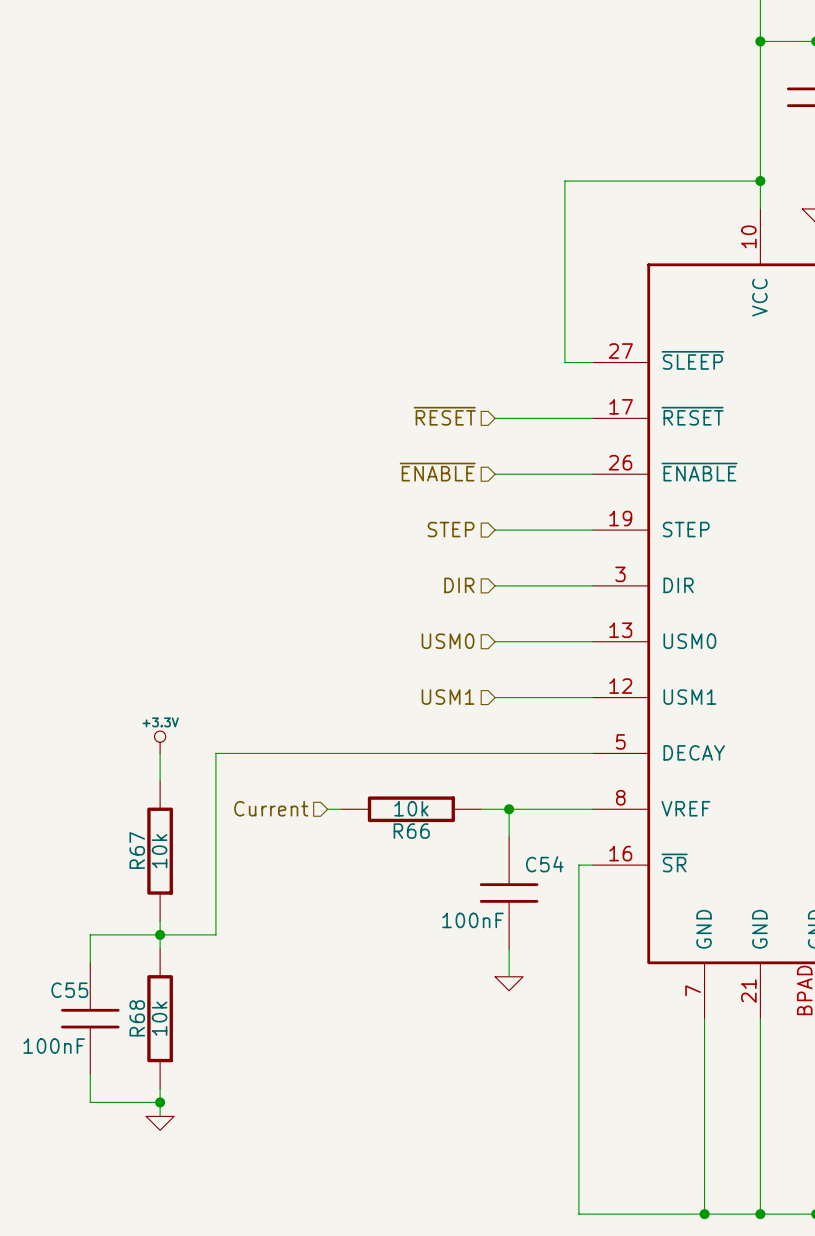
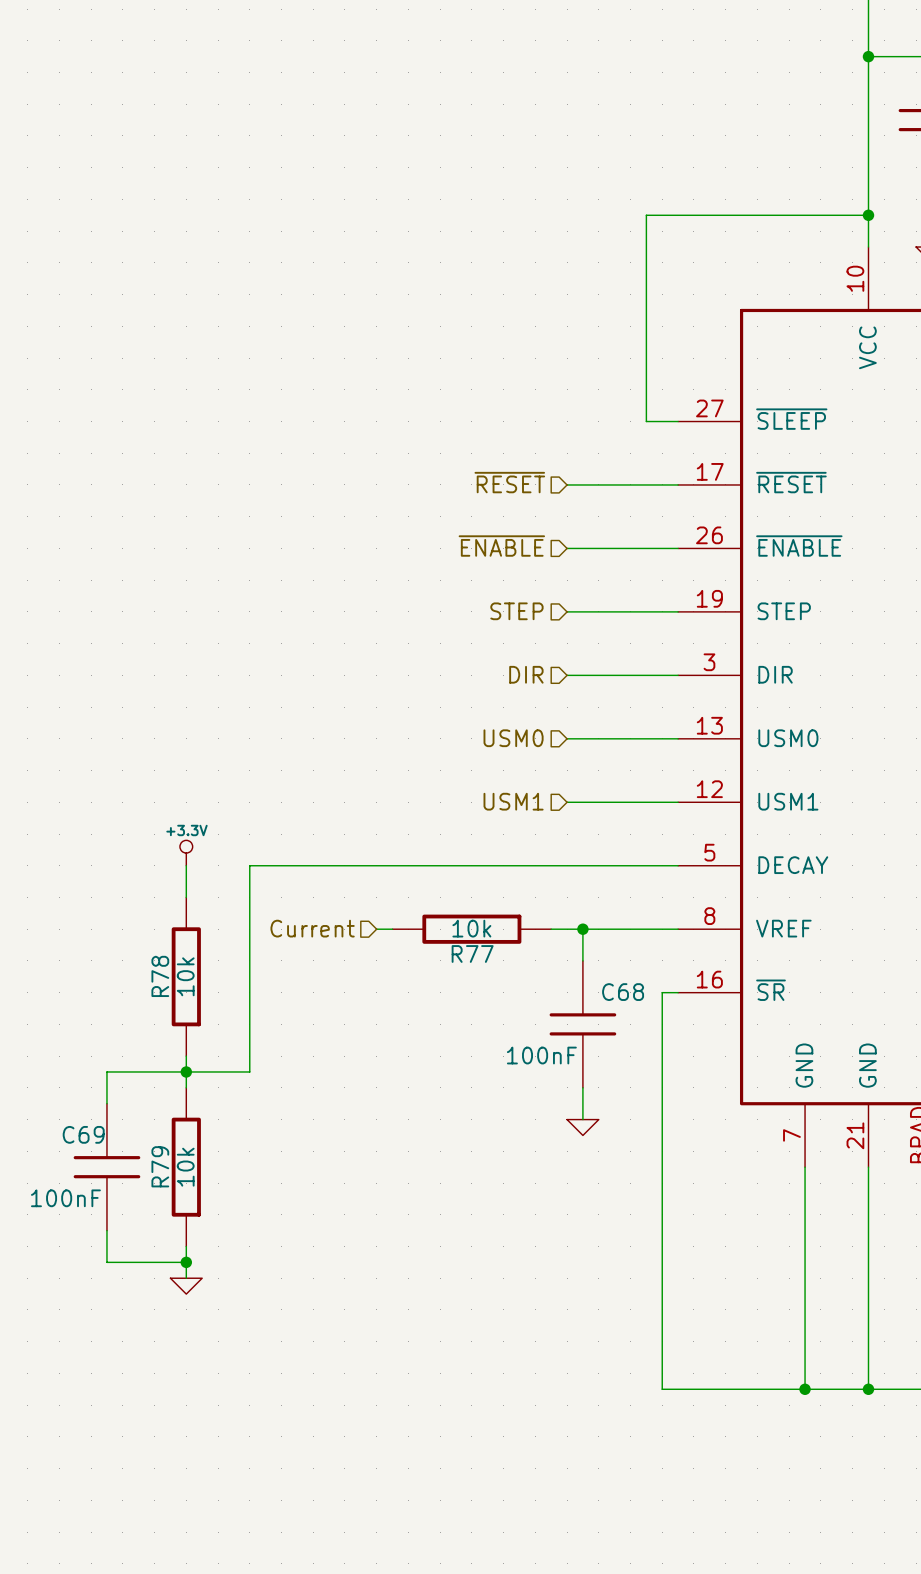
R66 name: R66 (411, 831) -> R77 (472, 953)
R67 name: R67 (137, 850) -> R78 (160, 976)
C54 name: C54 (544, 864) -> C68 (623, 992)
C55 name: C55 (69, 990) -> C69 (83, 1134)
R68 name: R68 (137, 1018) -> R79 (160, 1166)

